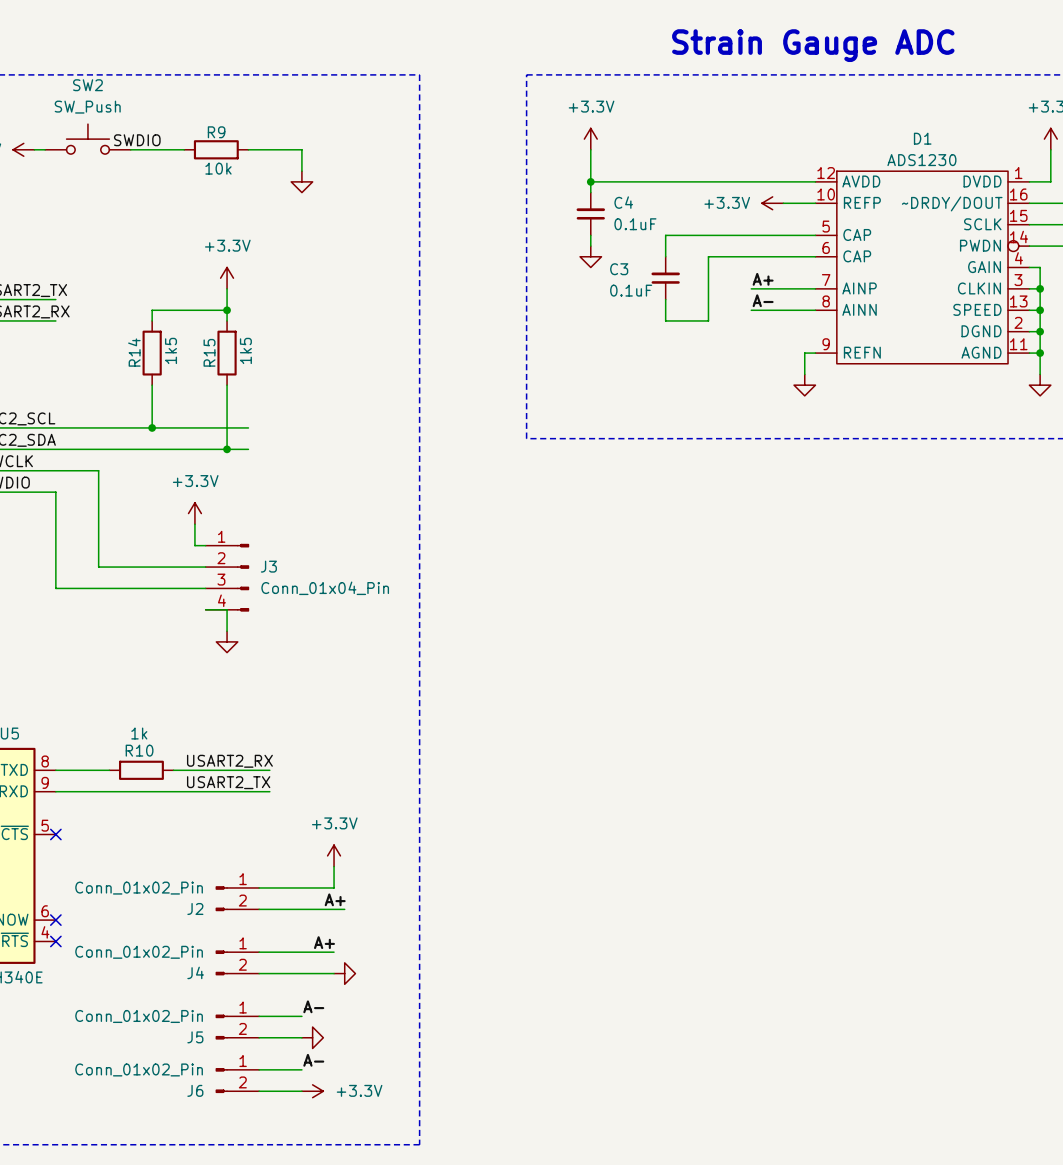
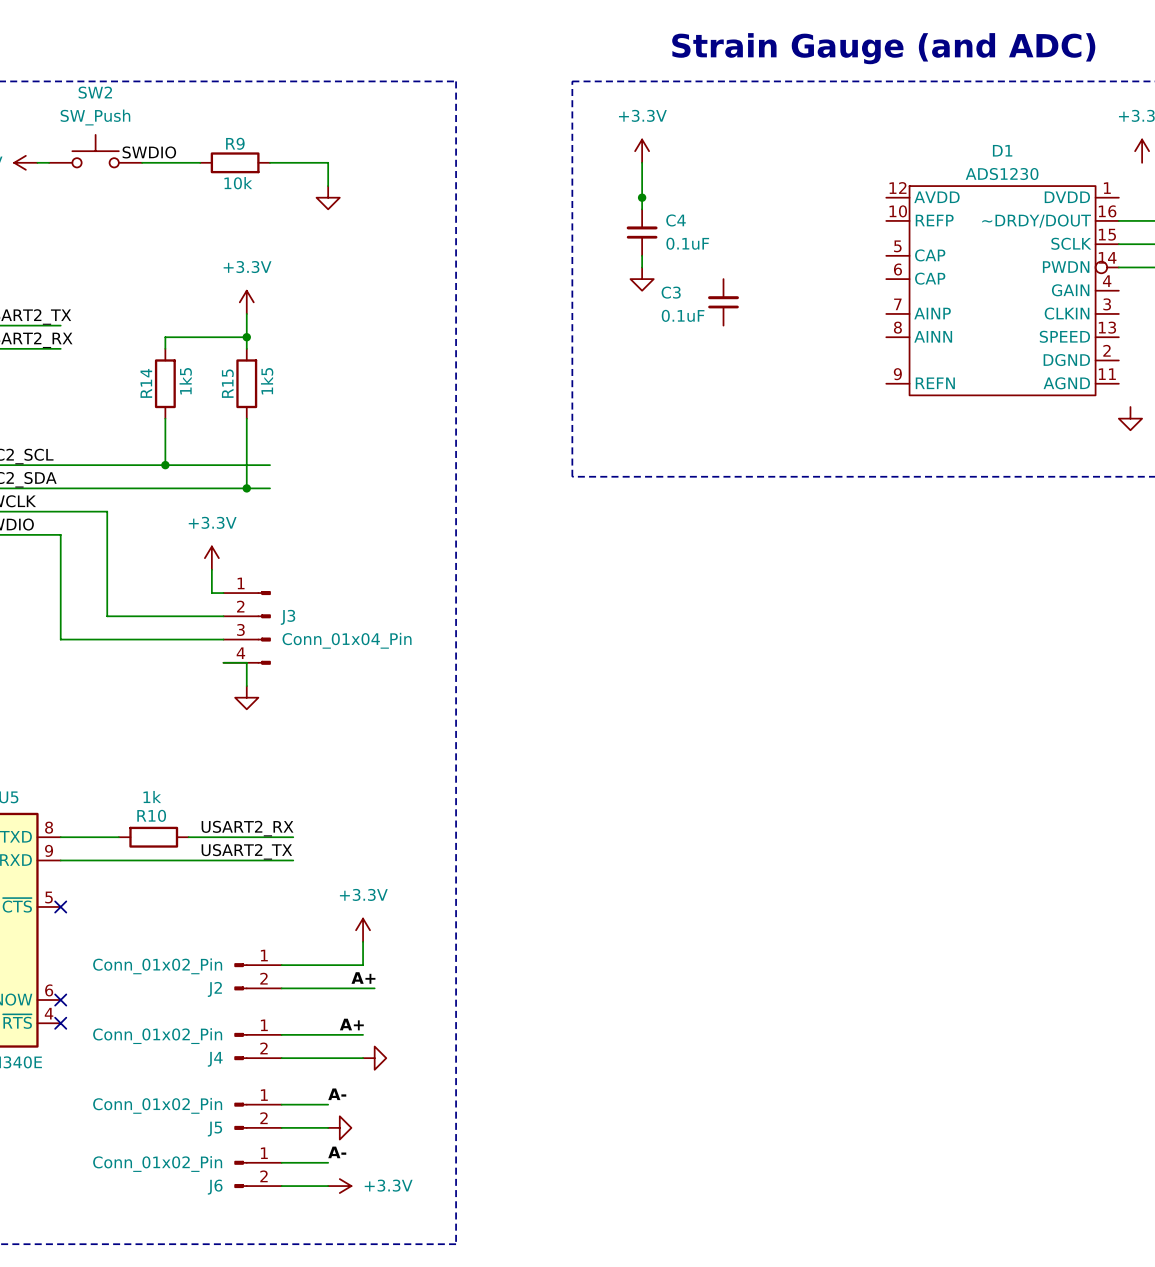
text: Strain Gauge ADC (813, 45) -> Strain Gauge (and ADC) (883, 48)
wire: (1050, 149) (1050, 181) (1029, 181) -> none
wire: (590, 181) (815, 181) -> none
power symbol: +3.3V (772, 203) -> none
wire: (783, 203) (815, 203) -> none
wire: (815, 235) (665, 235) (665, 256) -> none
wire: (815, 256) (708, 256) (708, 320) (665, 320) (665, 299) -> none
wire: (1029, 267) (1040, 267) (1040, 374) -> none
label: A+ (763, 279) -> none
wire: (751, 288) (815, 288) -> none
wire: (1029, 288) (1040, 288) -> none
junction: (1040, 288) -> none
label: A- (763, 300) -> none
wire: (751, 310) (815, 310) -> none
wire: (1029, 310) (1040, 310) -> none
junction: (1040, 310) -> none
wire: (1029, 331) (1040, 331) -> none
junction: (1040, 331) -> none
wire: (815, 353) (804, 353) (804, 374) -> none
wire: (1029, 353) (1040, 353) -> none
junction: (1040, 353) -> none
power symbol: (804, 385) -> none

